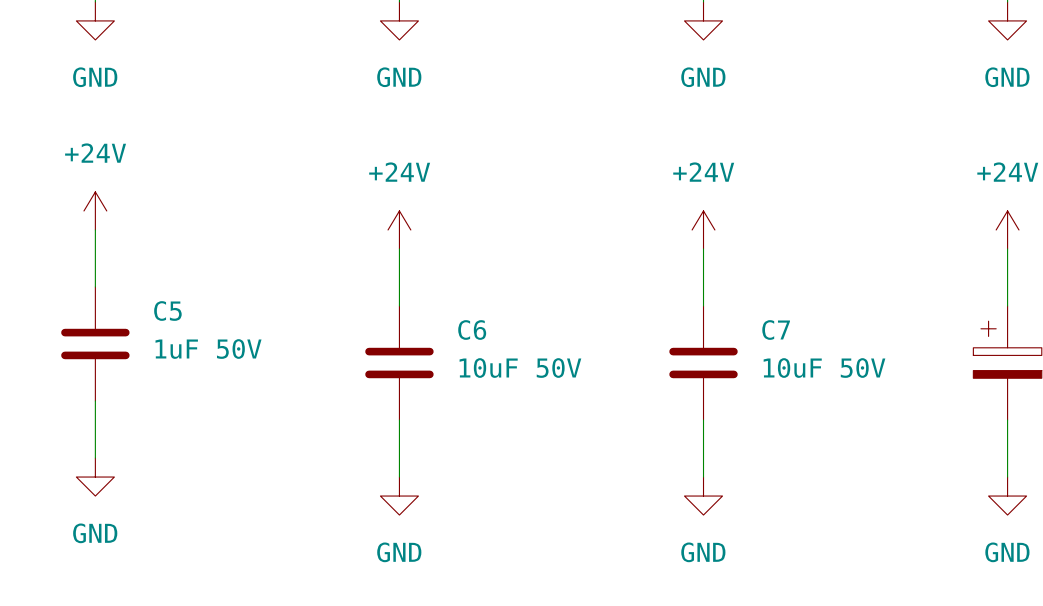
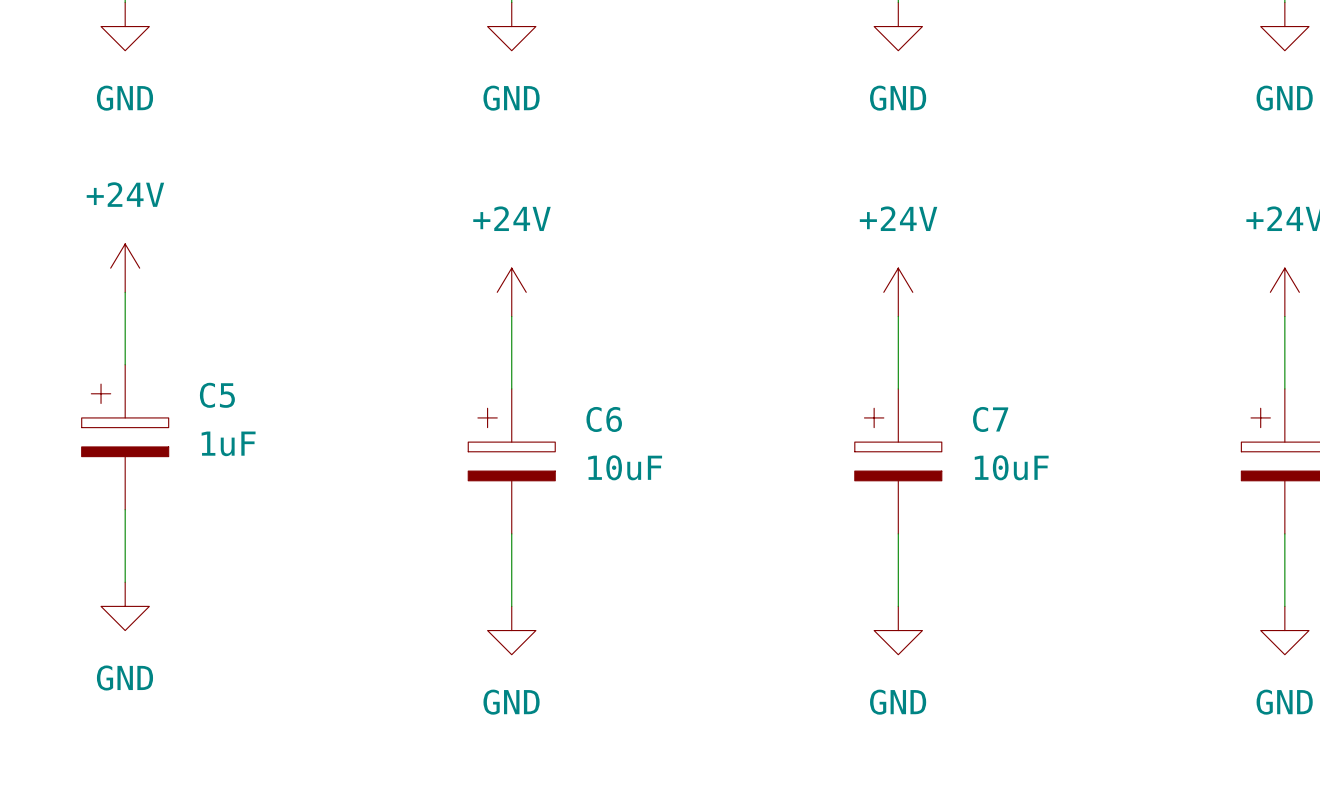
C5 symbol: [61, 286, 130, 402] -> [81, 364, 169, 510]
C6 symbol: [365, 305, 434, 421] -> [468, 388, 556, 534]
C7 symbol: [669, 305, 738, 421] -> [854, 388, 942, 534]
C5 value: 1uF 50V (208, 349) -> 1uF (228, 443)
C6 value: 10uF 50V (520, 368) -> 10uF (625, 467)
C7 value: 10uF 50V (824, 368) -> 10uF (1011, 467)

